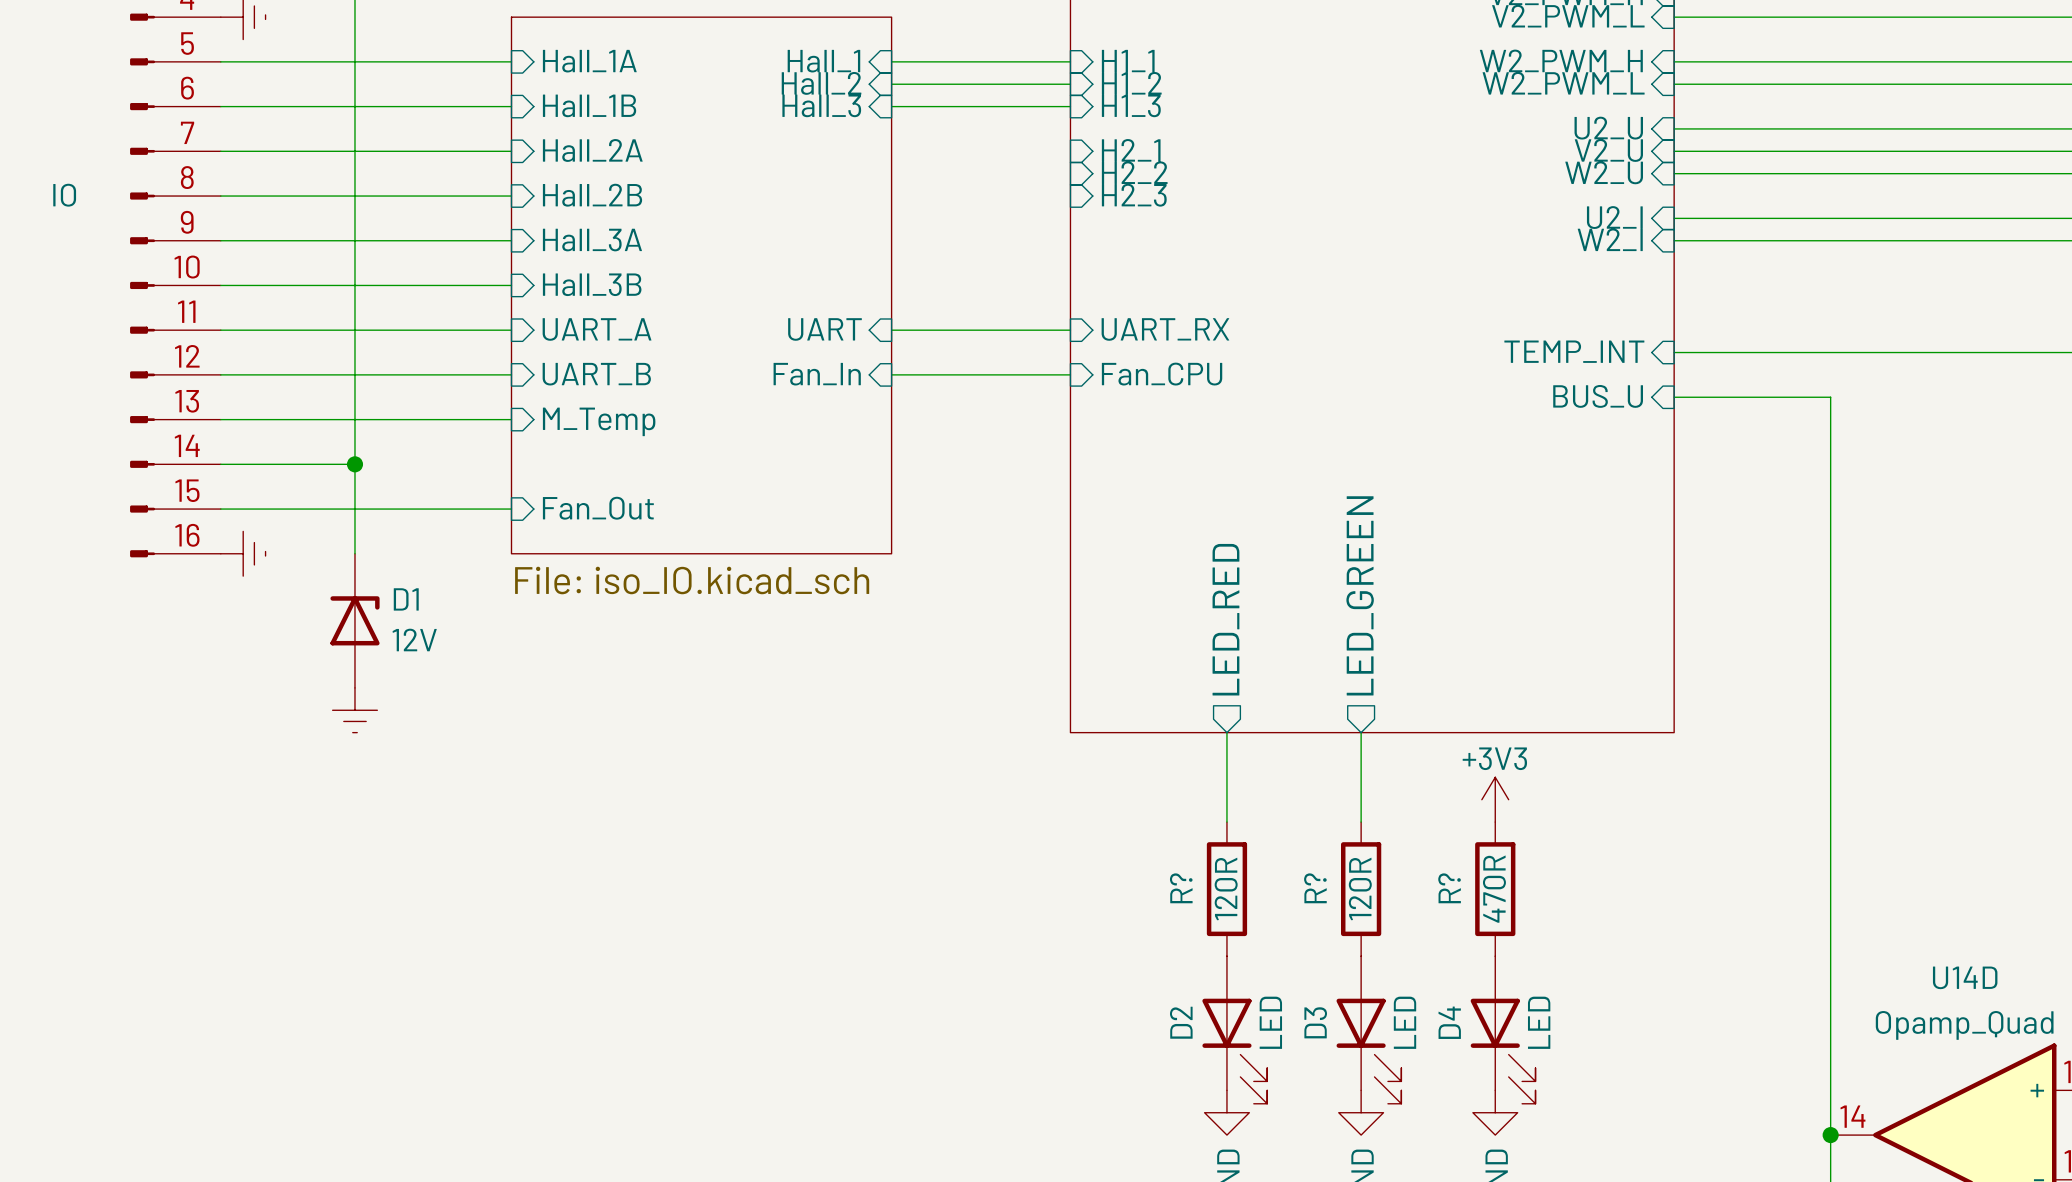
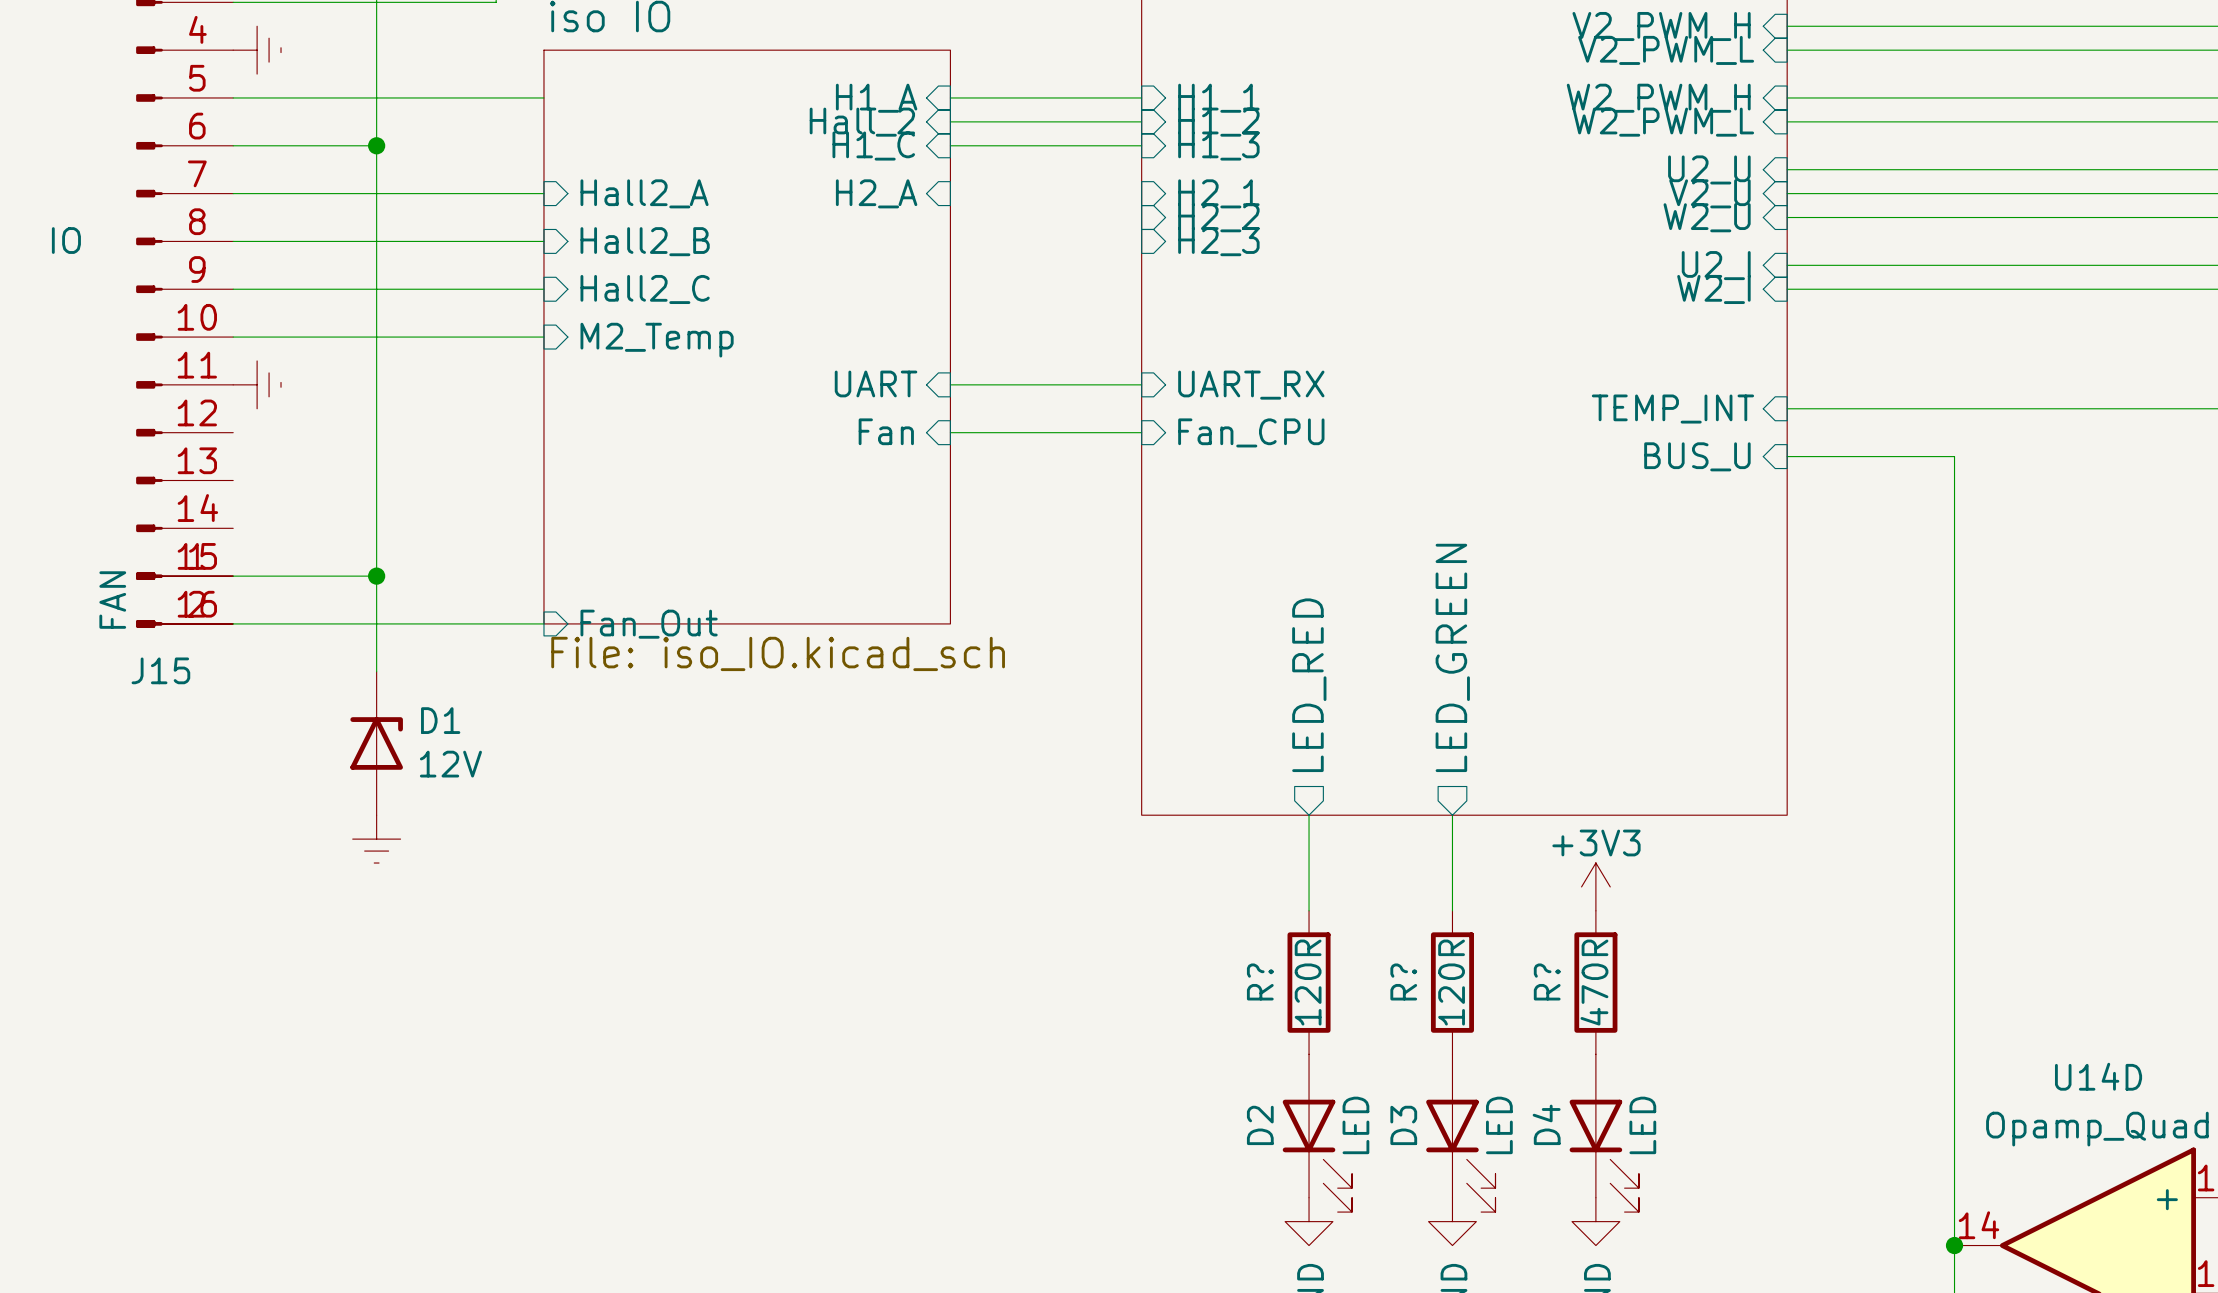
sheet pin: Hall_1A (589, 61) -> none
sheet pin: Hall_1 (823, 61) -> H1_A (876, 98)
sheet pin: Hall_1B (589, 105) -> none
sheet pin: Hall_3 (821, 105) -> H1_C (873, 146)
wire: (354, 106) (511, 106) -> none
junction: none -> (376, 145)
sheet pin: Hall_2A (592, 150) -> Hall2_A (644, 193)
sheet pin: none -> H2_A (876, 193)
sheet pin: Hall_2B (592, 195) -> Hall2_B (645, 241)
sheet pin: Hall_3A (592, 240) -> Hall2_C (645, 289)
sheet pin: Hall_3B (592, 284) -> M2_Temp (657, 340)
sheet pin: UART_A (597, 329) -> none
wire: (220, 330) (511, 330) -> none
power symbol: none -> (257, 384)
wire: (220, 374) (511, 374) -> none
sheet pin: UART_B (596, 374) -> none
sheet pin: Fan_In (817, 374) -> Fan (886, 431)
wire: (220, 419) (511, 419) -> (233, 623) (543, 623)
sheet pin: M_Temp (599, 421) -> none
wire: (220, 464) (354, 464) -> none
junction position: (354, 464) -> (376, 576)
sheet pin position: Fan_Out (598, 508) -> Fan_Out (649, 624)
wire: (354, 509) (511, 509) -> none
J15: none -> FAN (184, 600)
power symbol: (243, 553) -> none
D1 position: (354, 620) -> (376, 743)
power symbol position: (354, 710) -> (376, 839)

